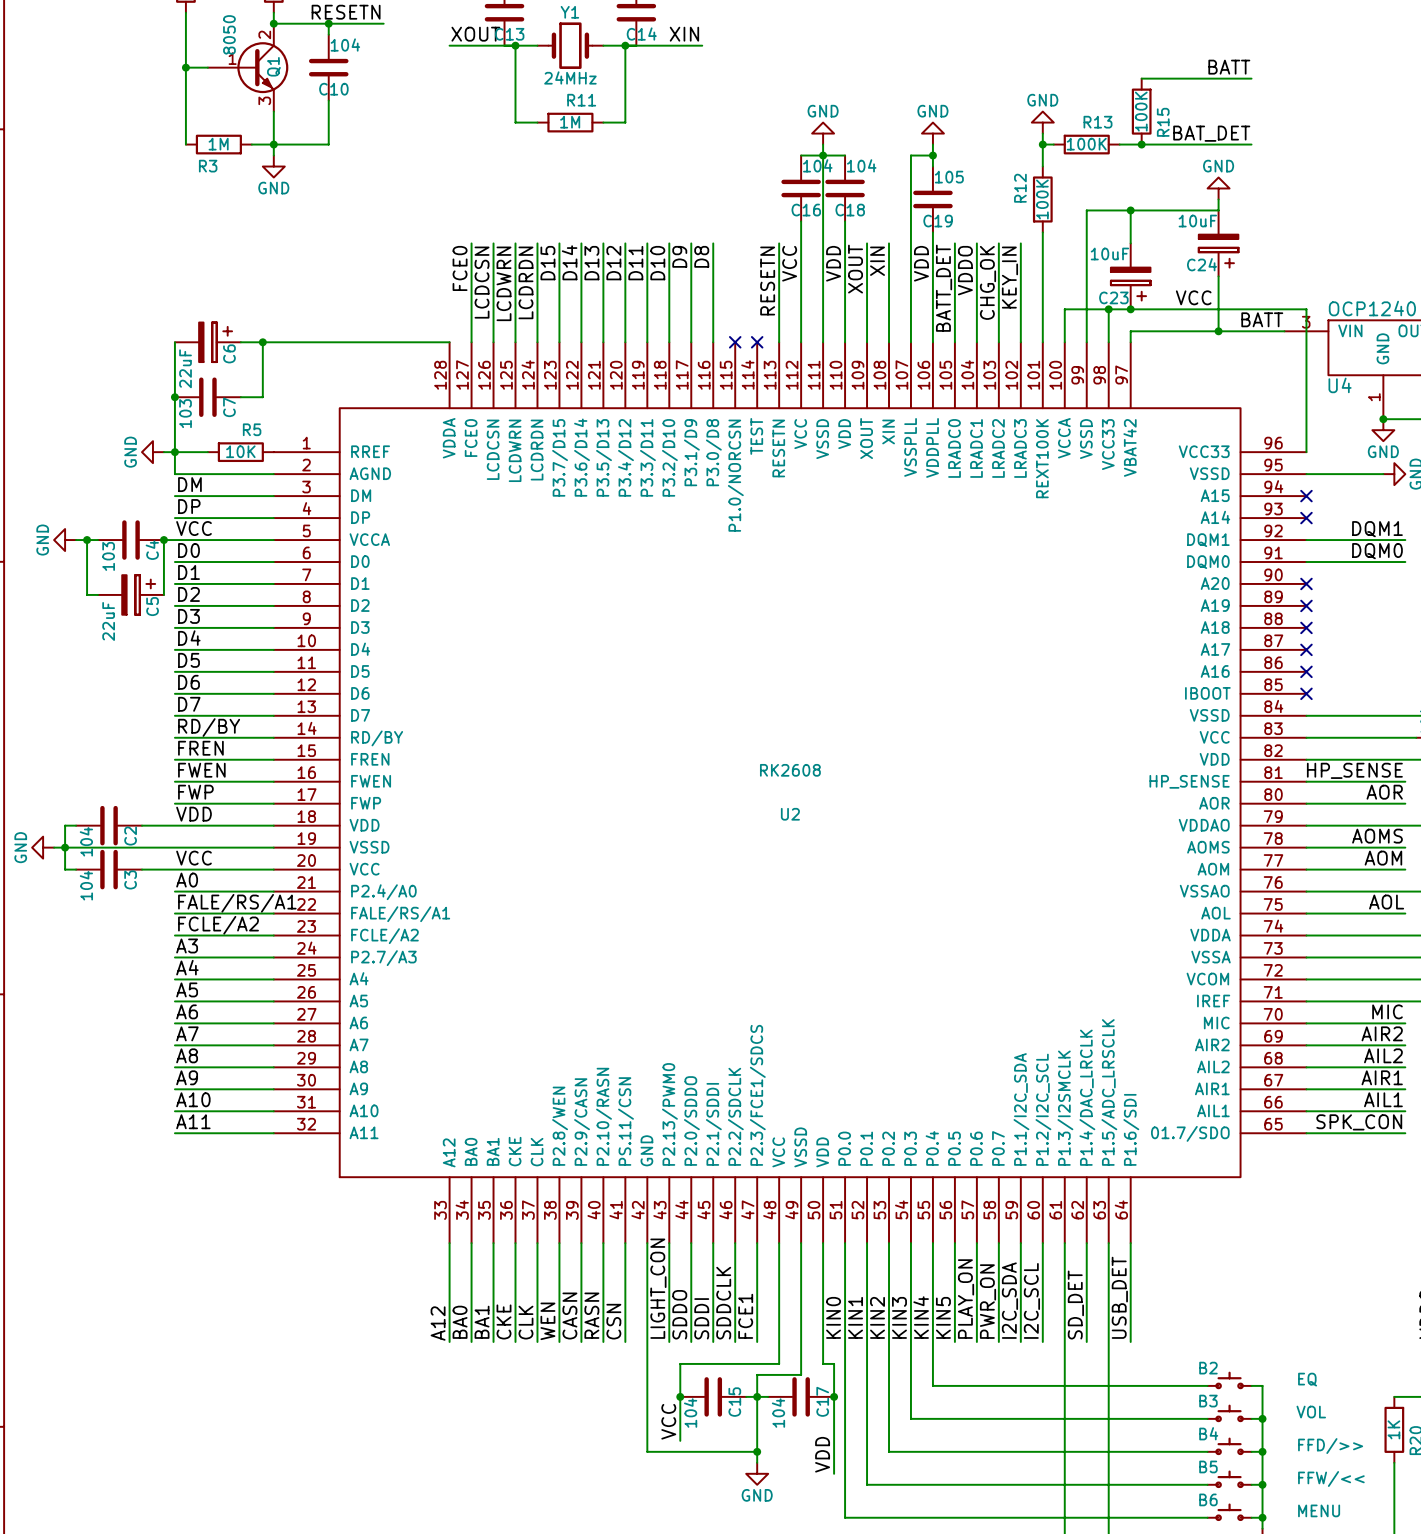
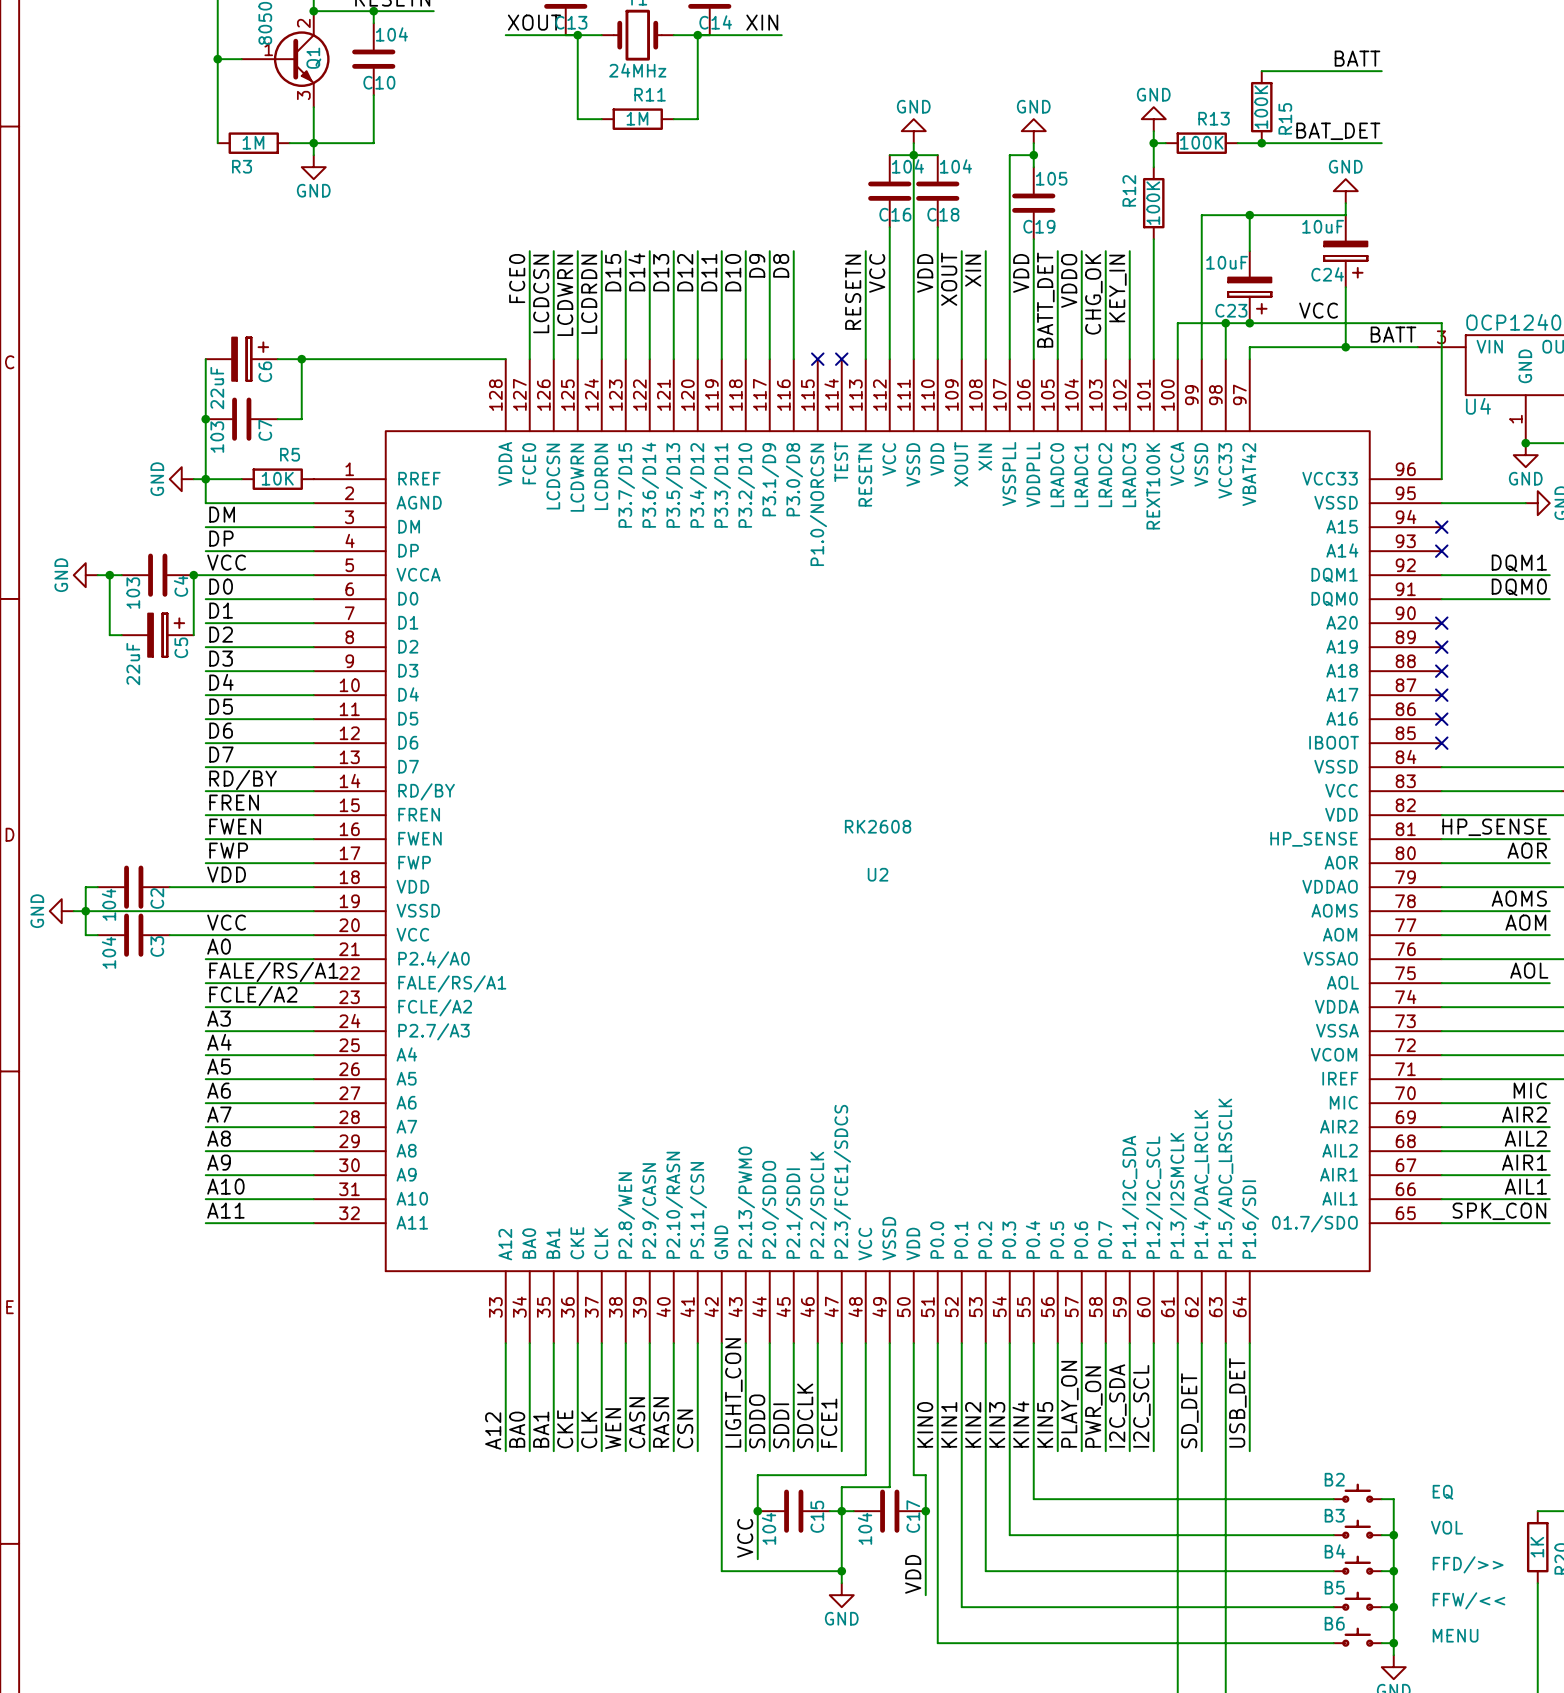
label: SDDCLK (723, 1303) -> SDCLK (805, 1415)

